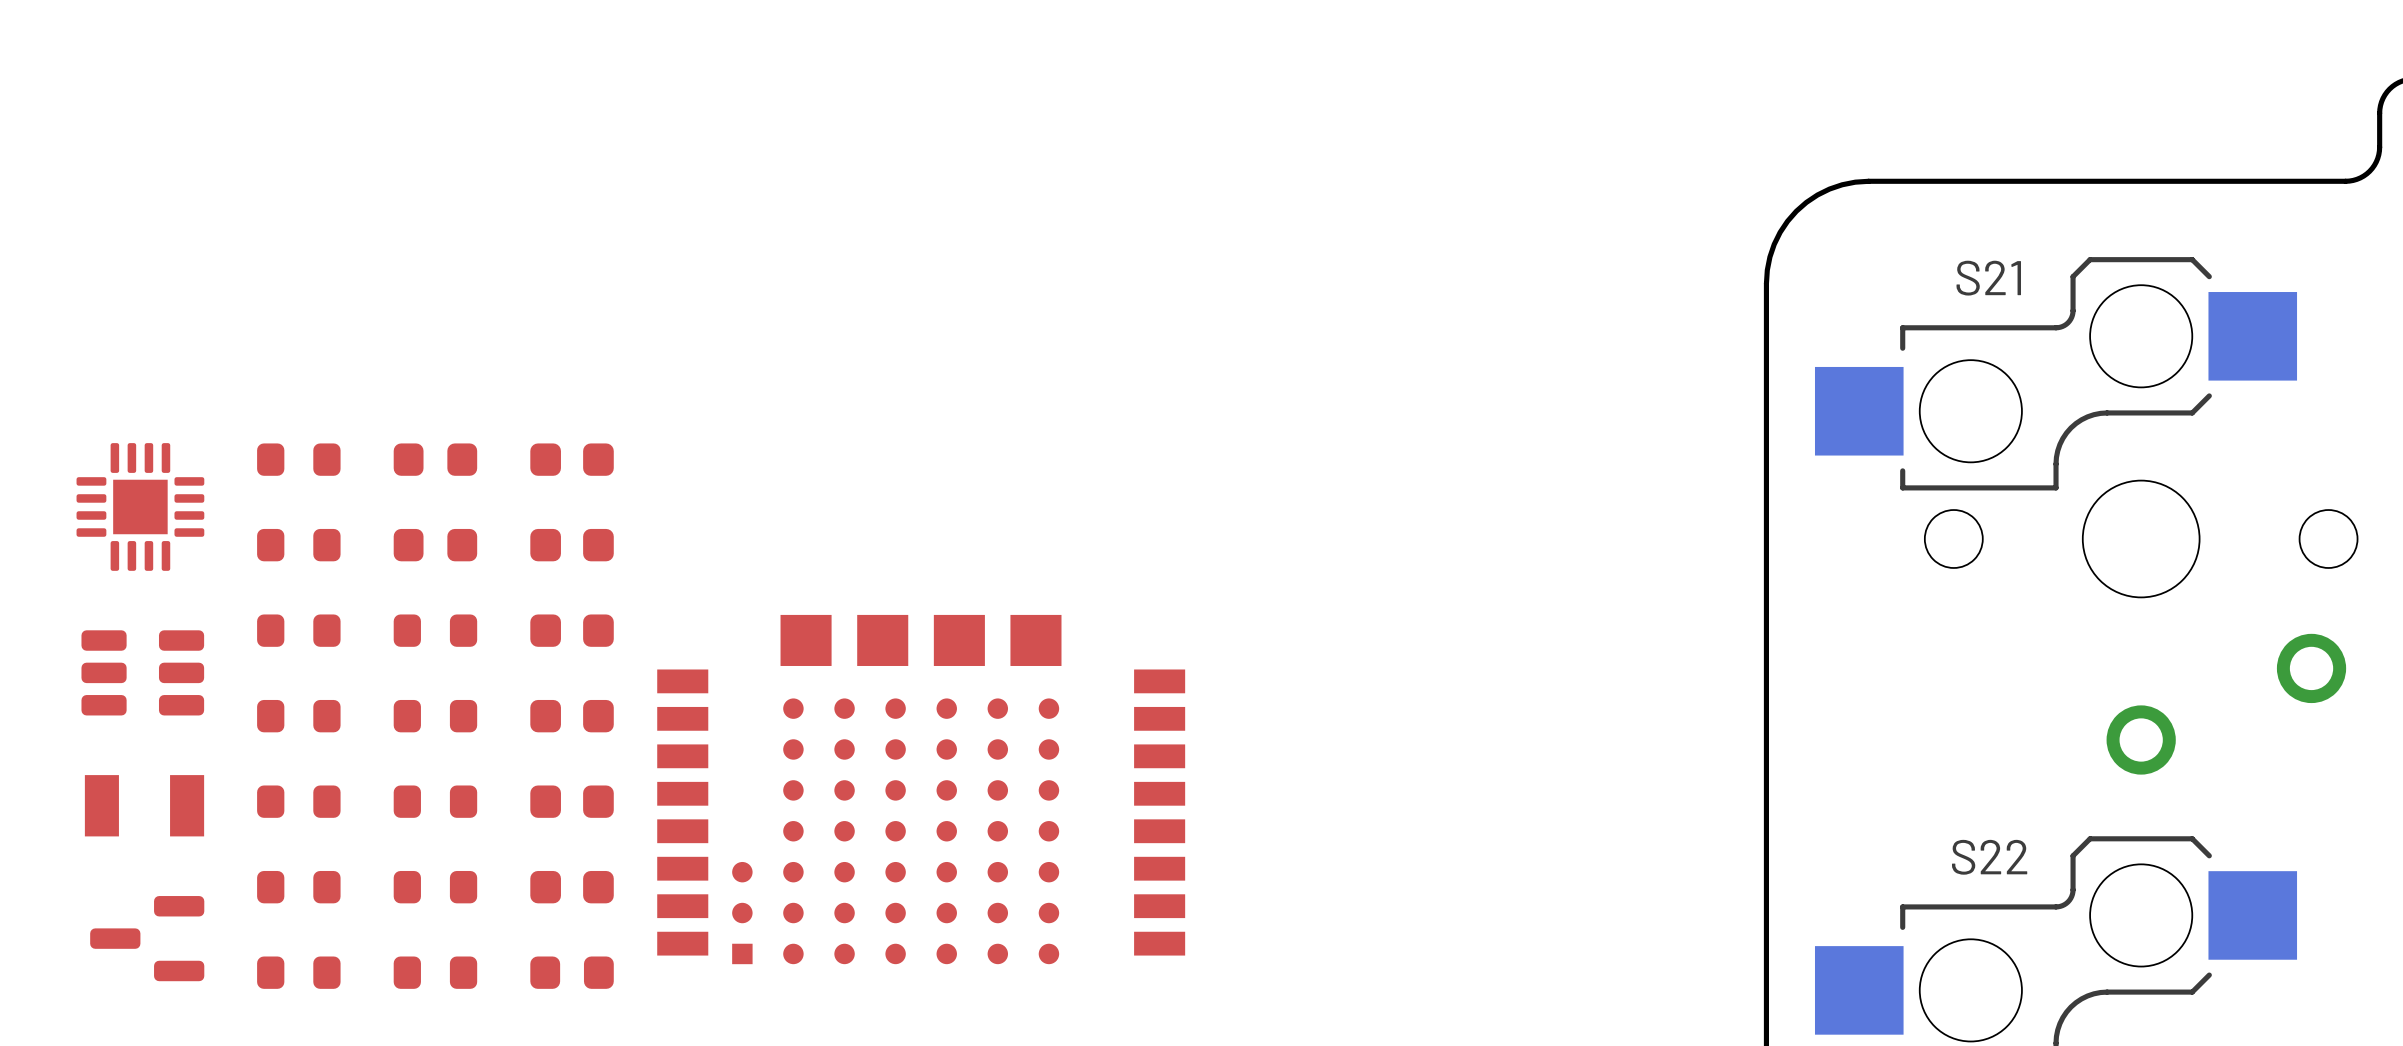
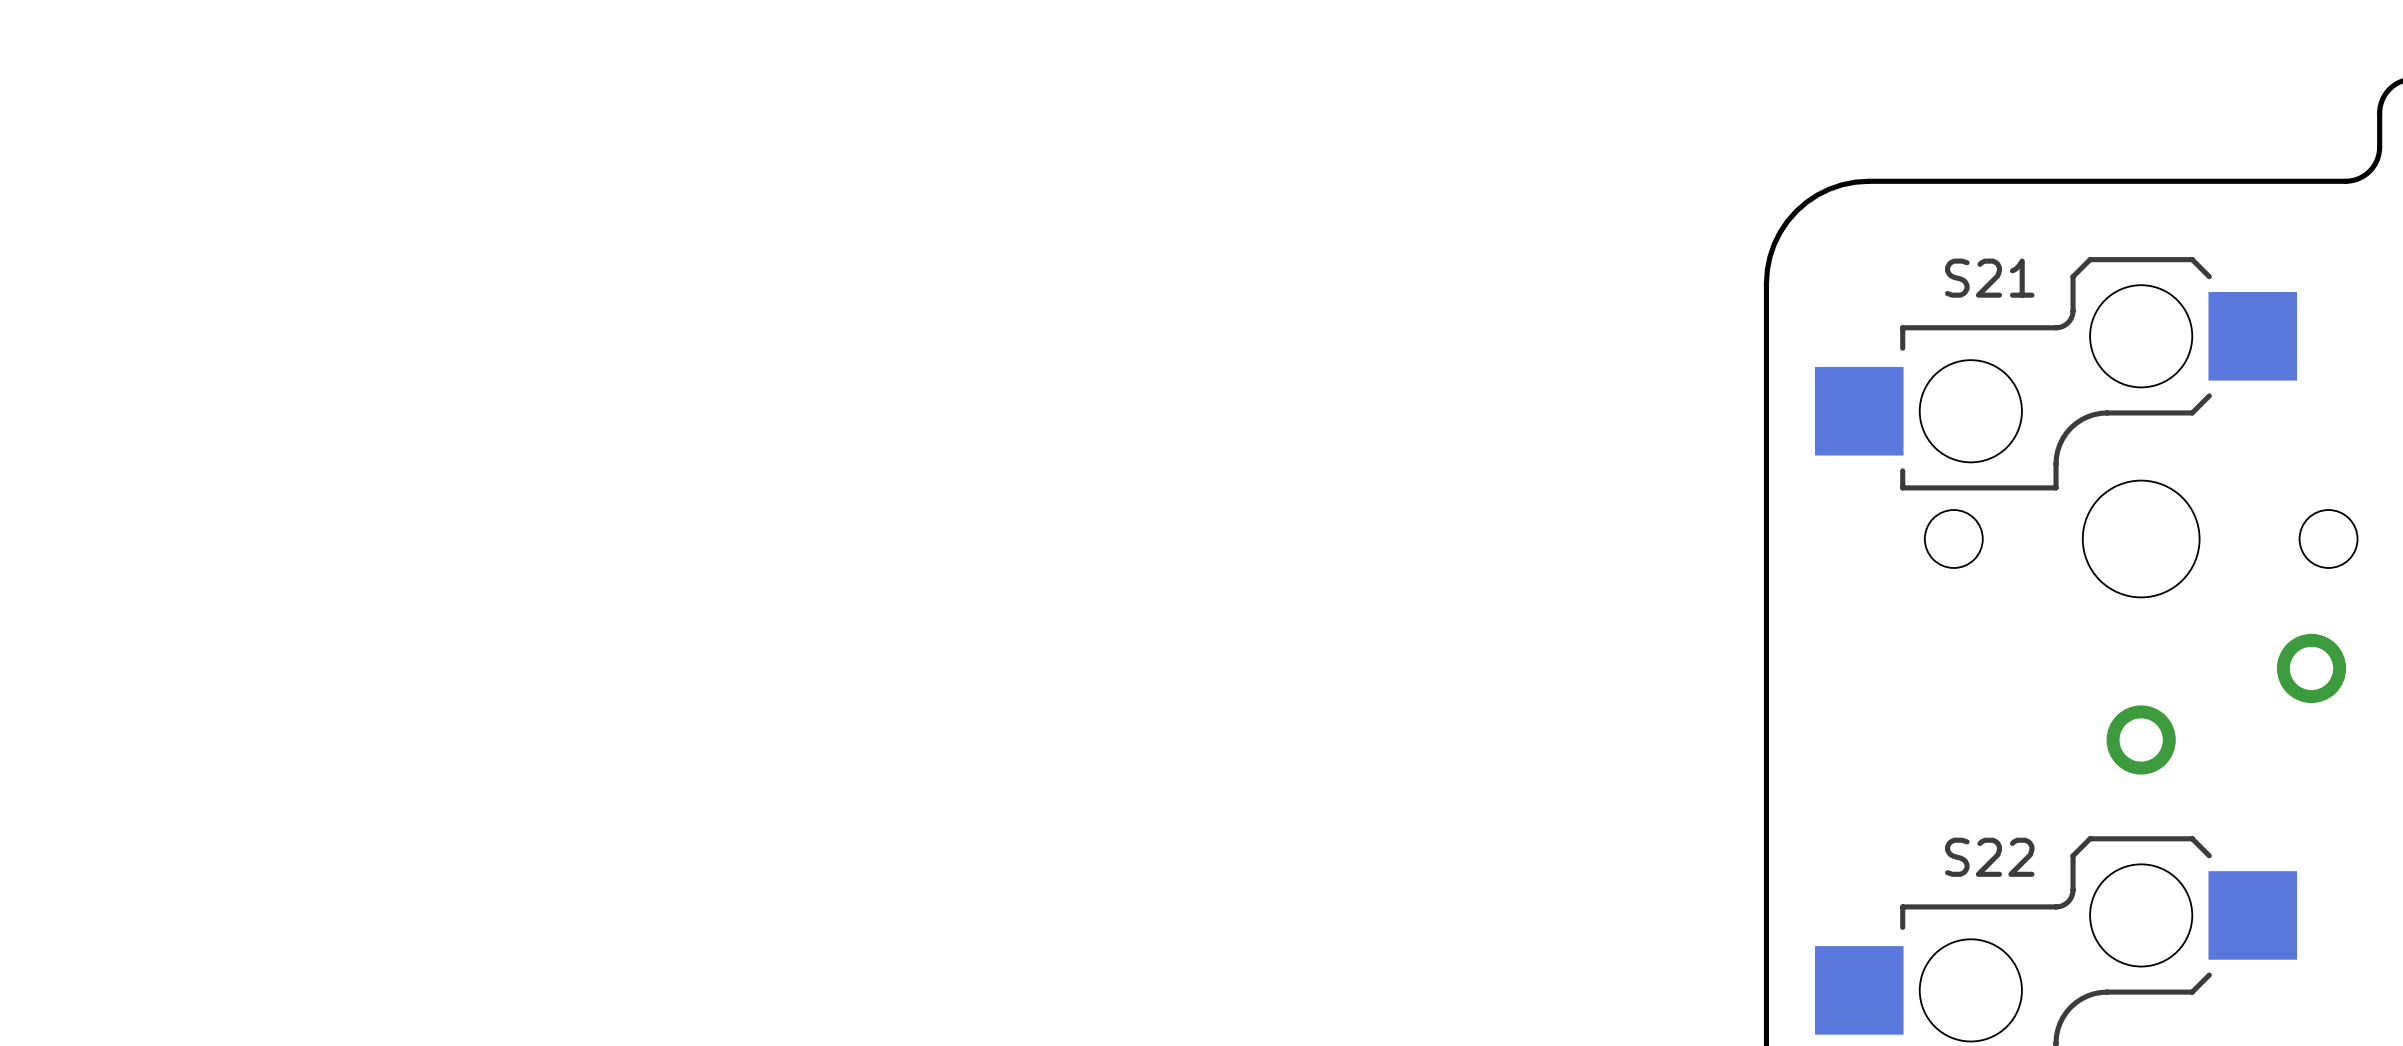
part: (298, 459) -> none
part: (435, 459) -> none
part: (572, 459) -> none
part: (140, 506) -> none
part: (298, 545) -> none
part: (435, 545) -> none
part: (572, 545) -> none
part: (298, 630) -> none
part: (435, 630) -> none
part: (572, 630) -> none
part: (142, 672) -> none
part: (298, 716) -> none
part: (435, 716) -> none
part: (572, 716) -> none
part: (921, 789) -> none
part: (298, 801) -> none
part: (435, 801) -> none
part: (572, 801) -> none
part: (144, 805) -> none
part: (298, 887) -> none
part: (435, 887) -> none
part: (572, 887) -> none
part: (147, 938) -> none
part: (298, 972) -> none
part: (435, 972) -> none
part: (572, 972) -> none

